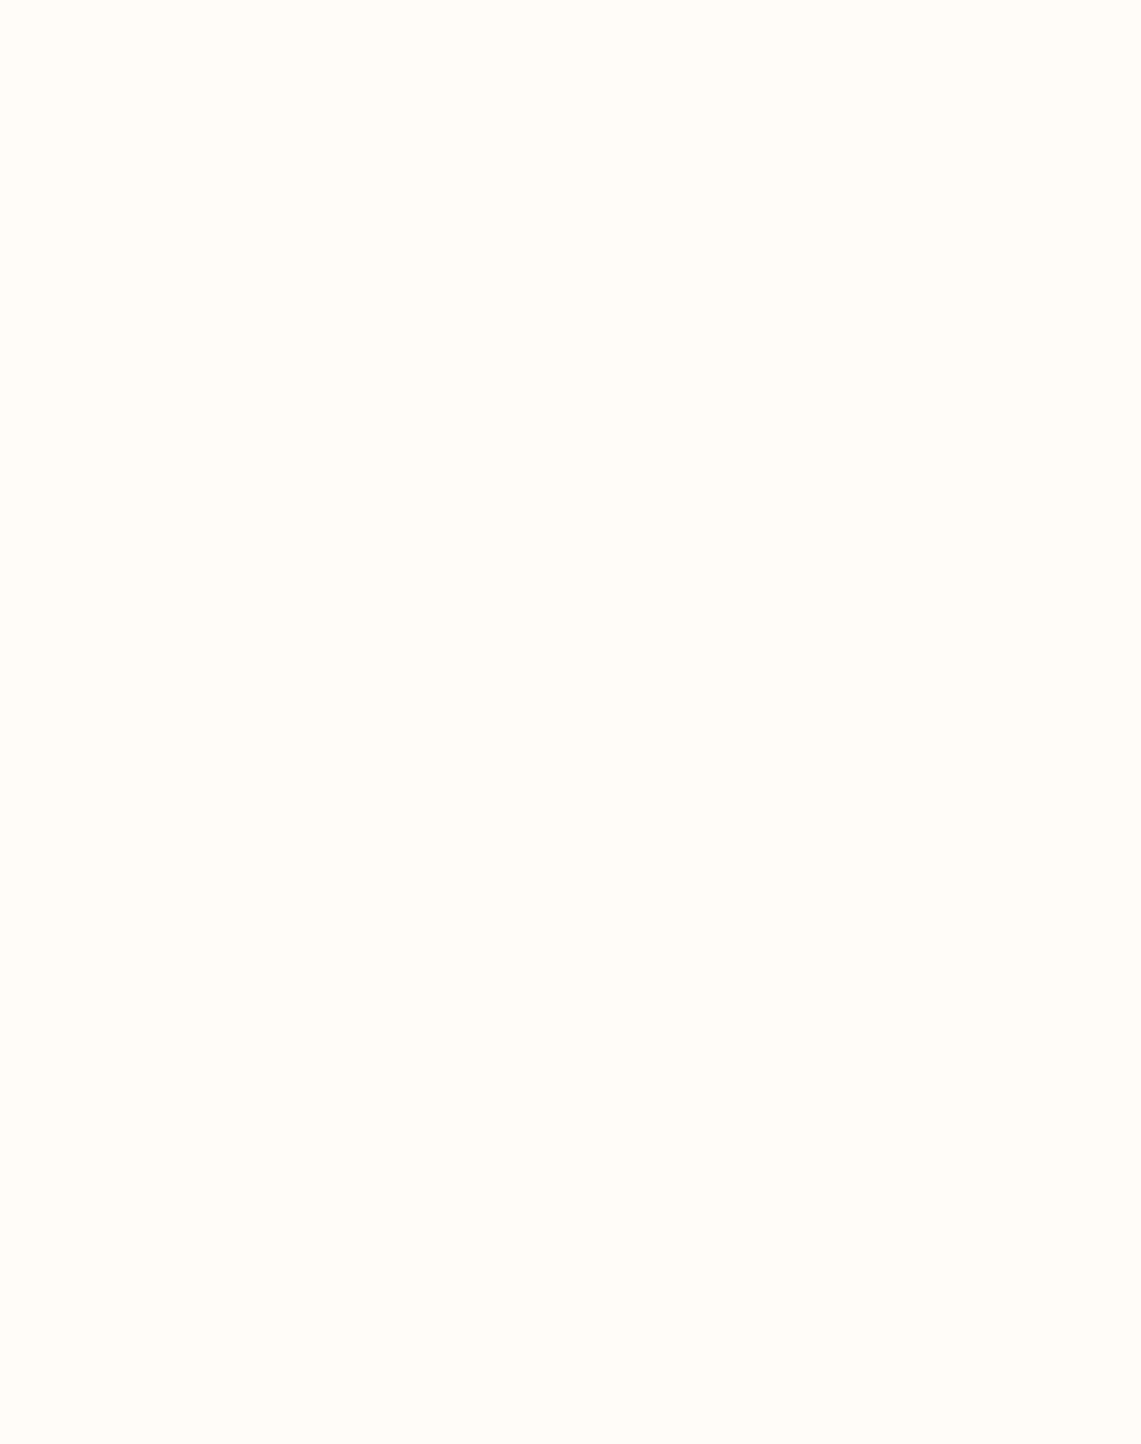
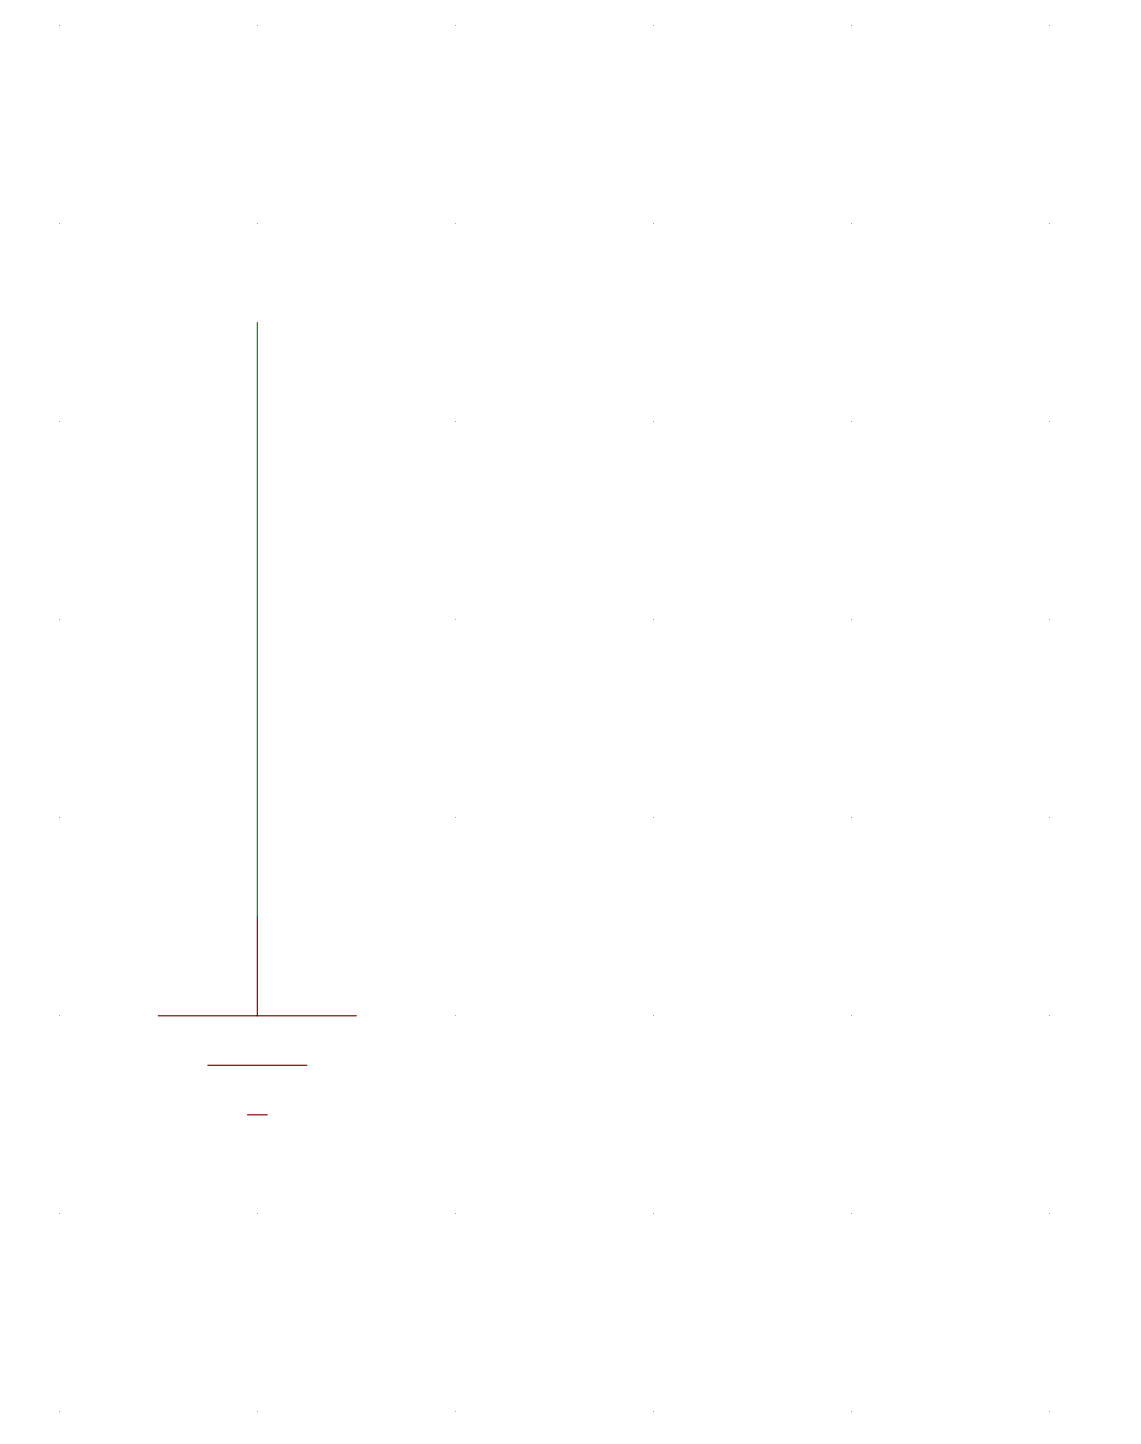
wire: none -> (257, 322) (257, 916)
power symbol: none -> (257, 1015)

